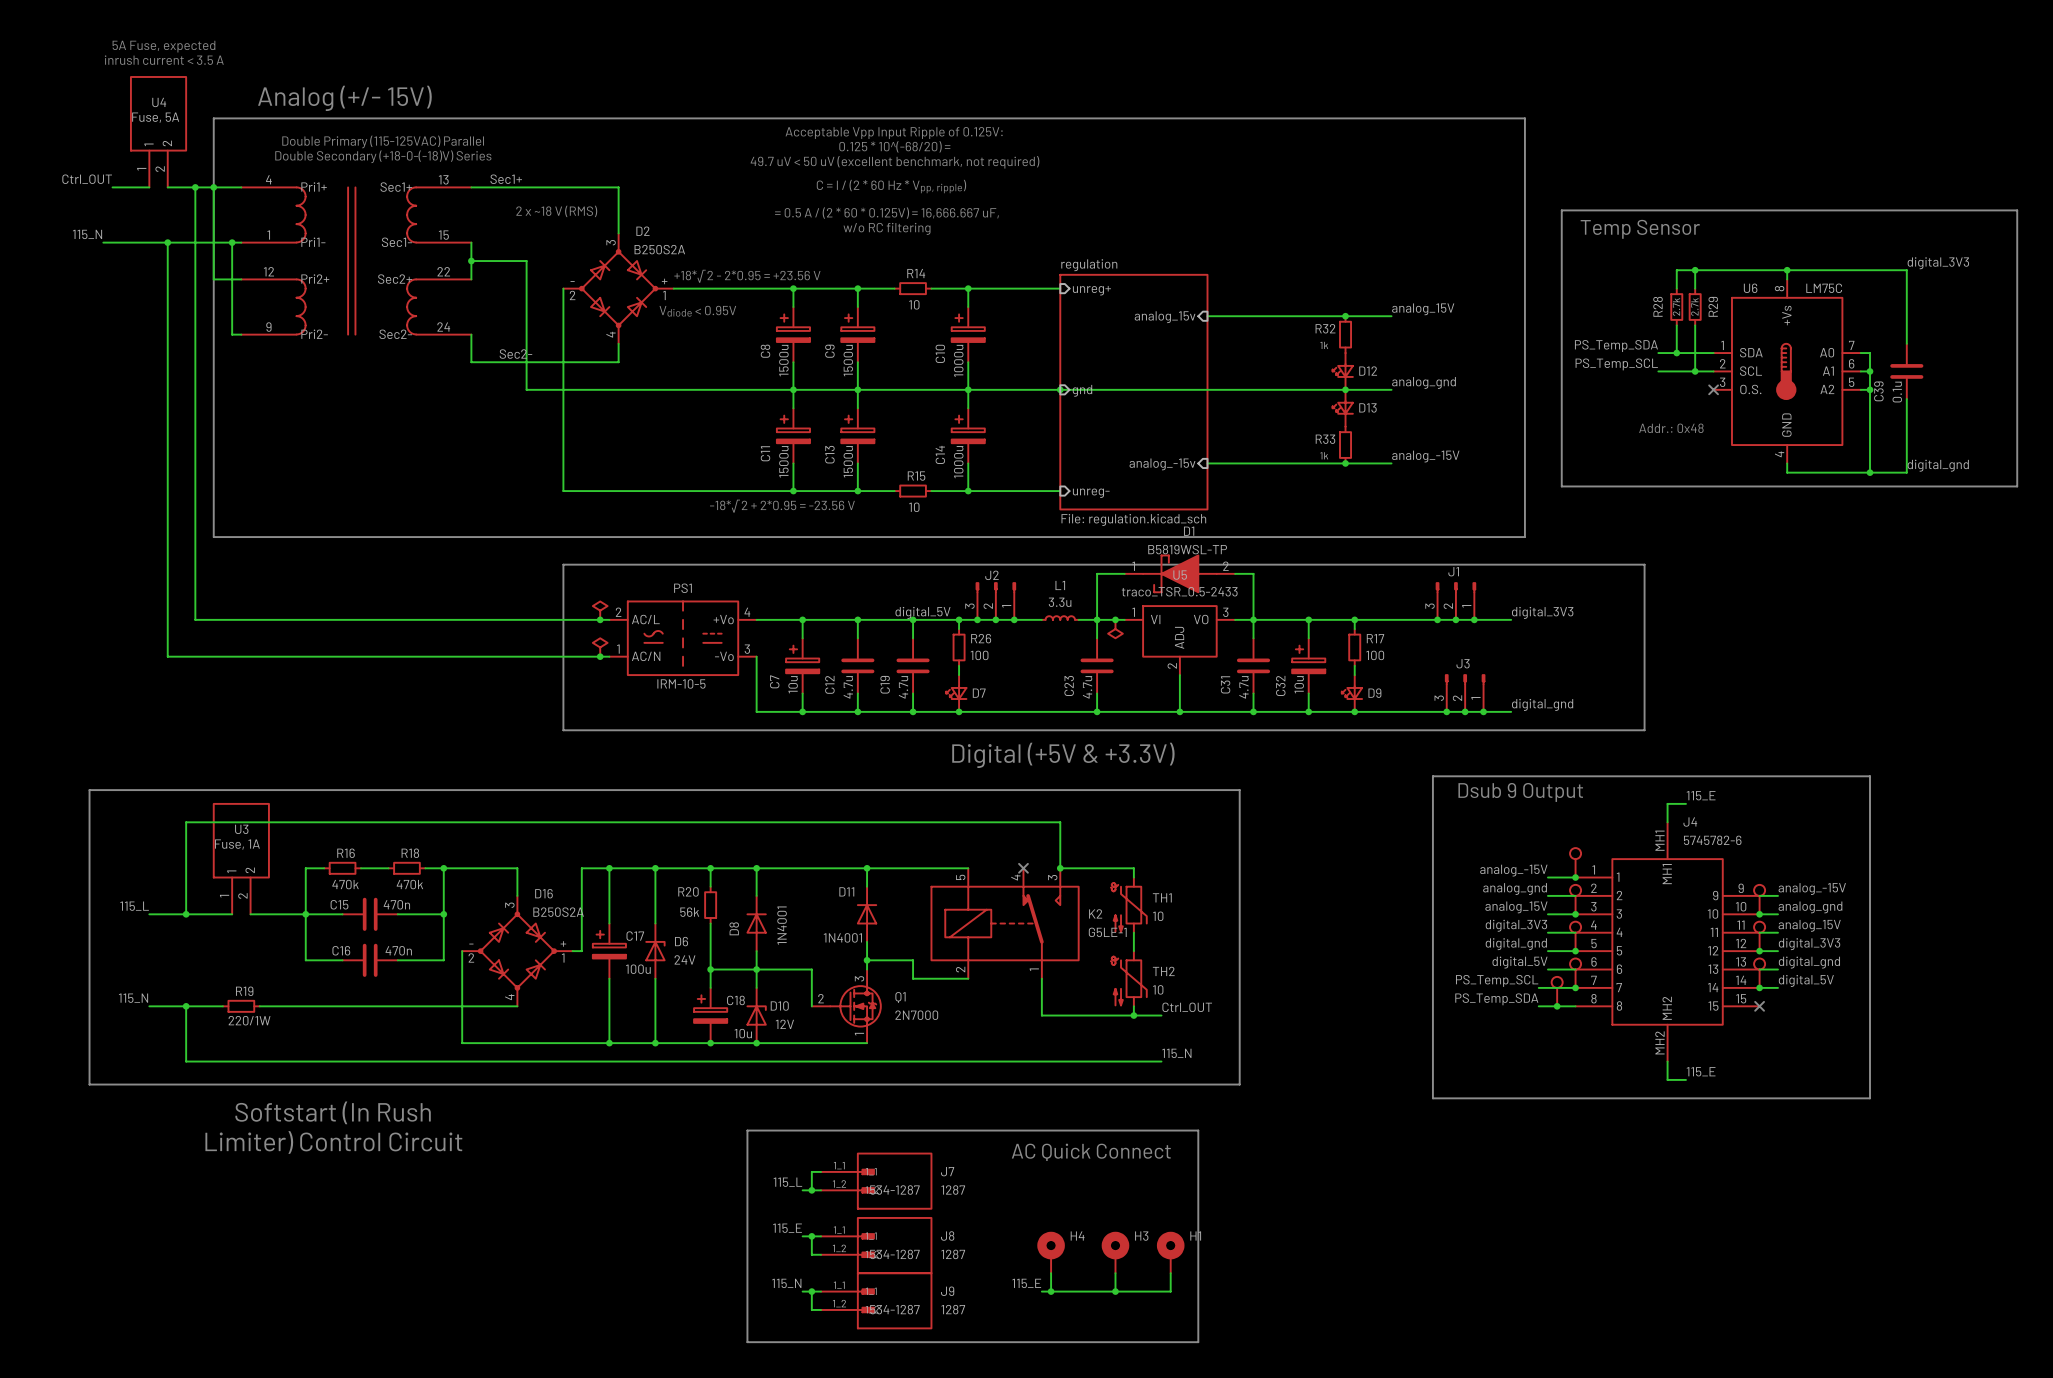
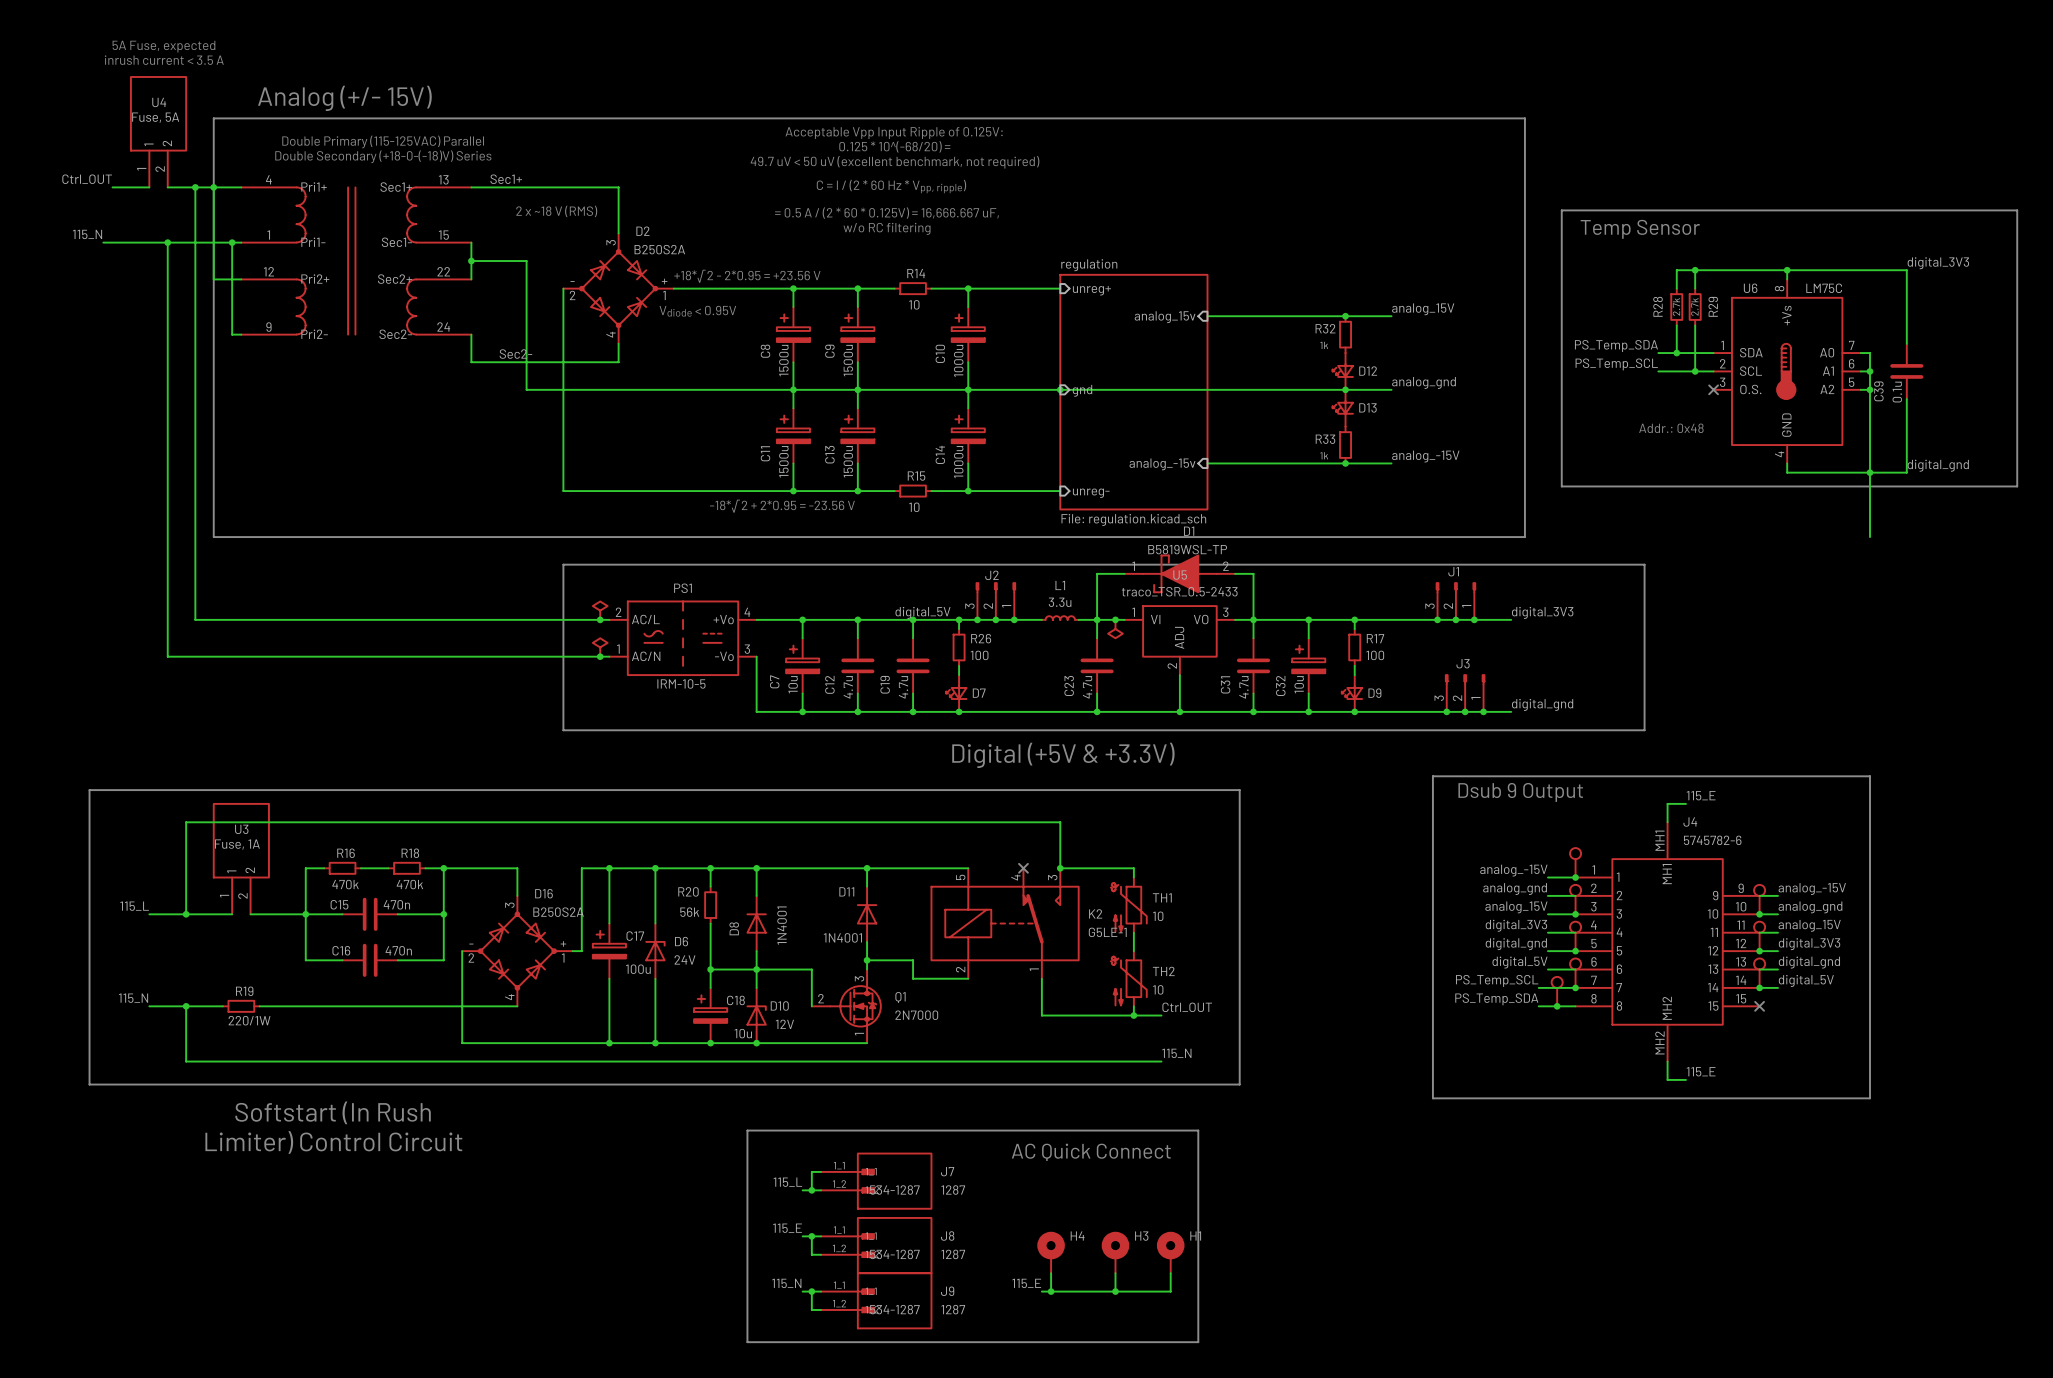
wire: none -> (1870, 472) (1870, 537)

